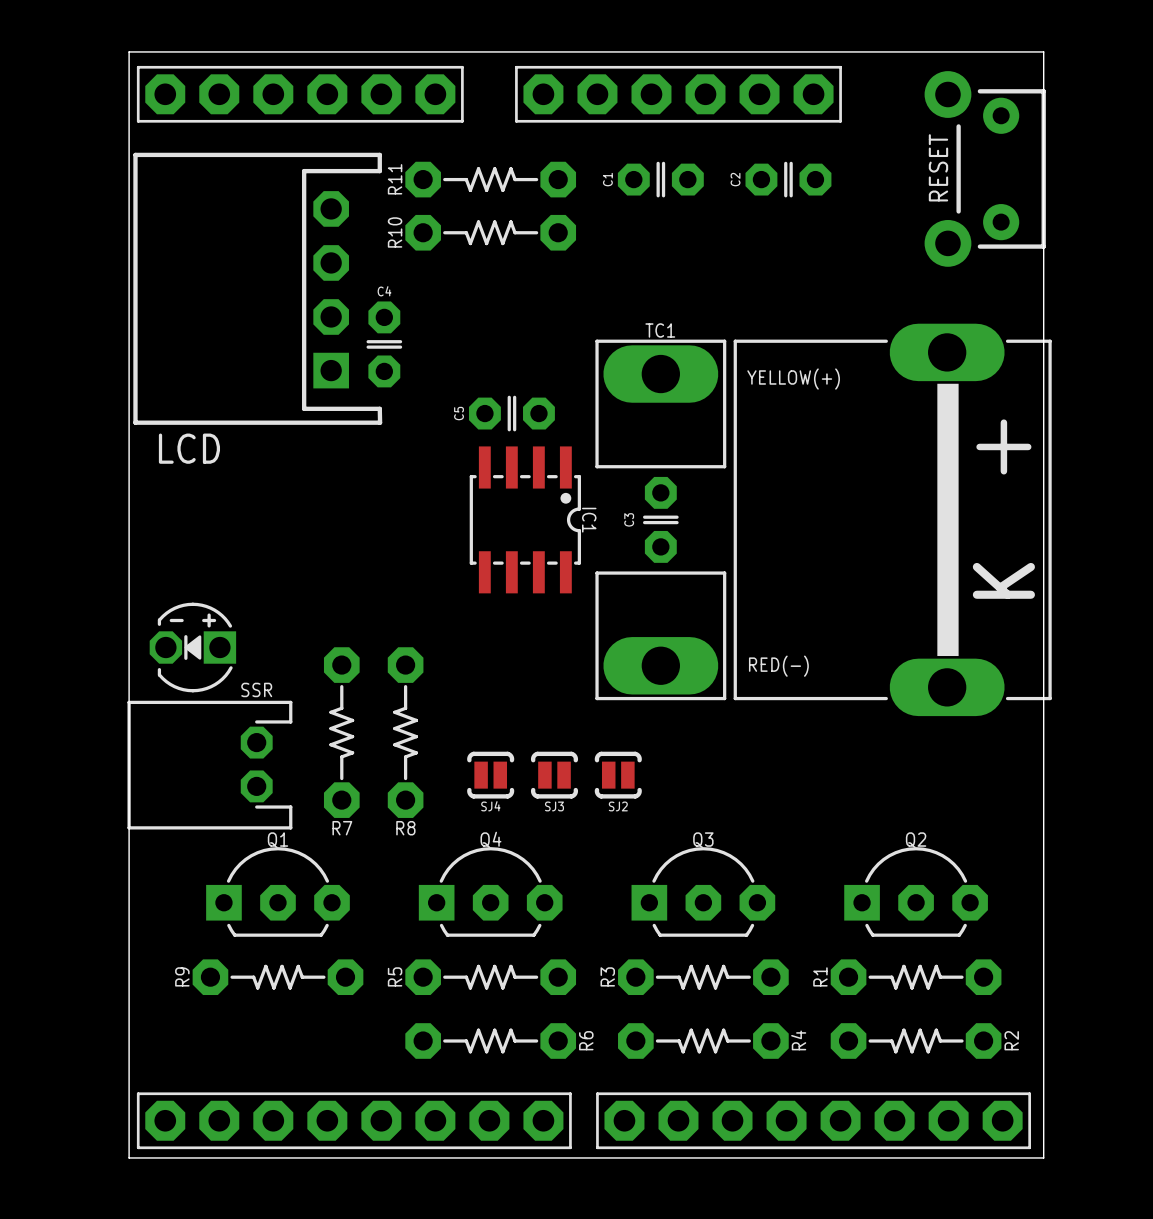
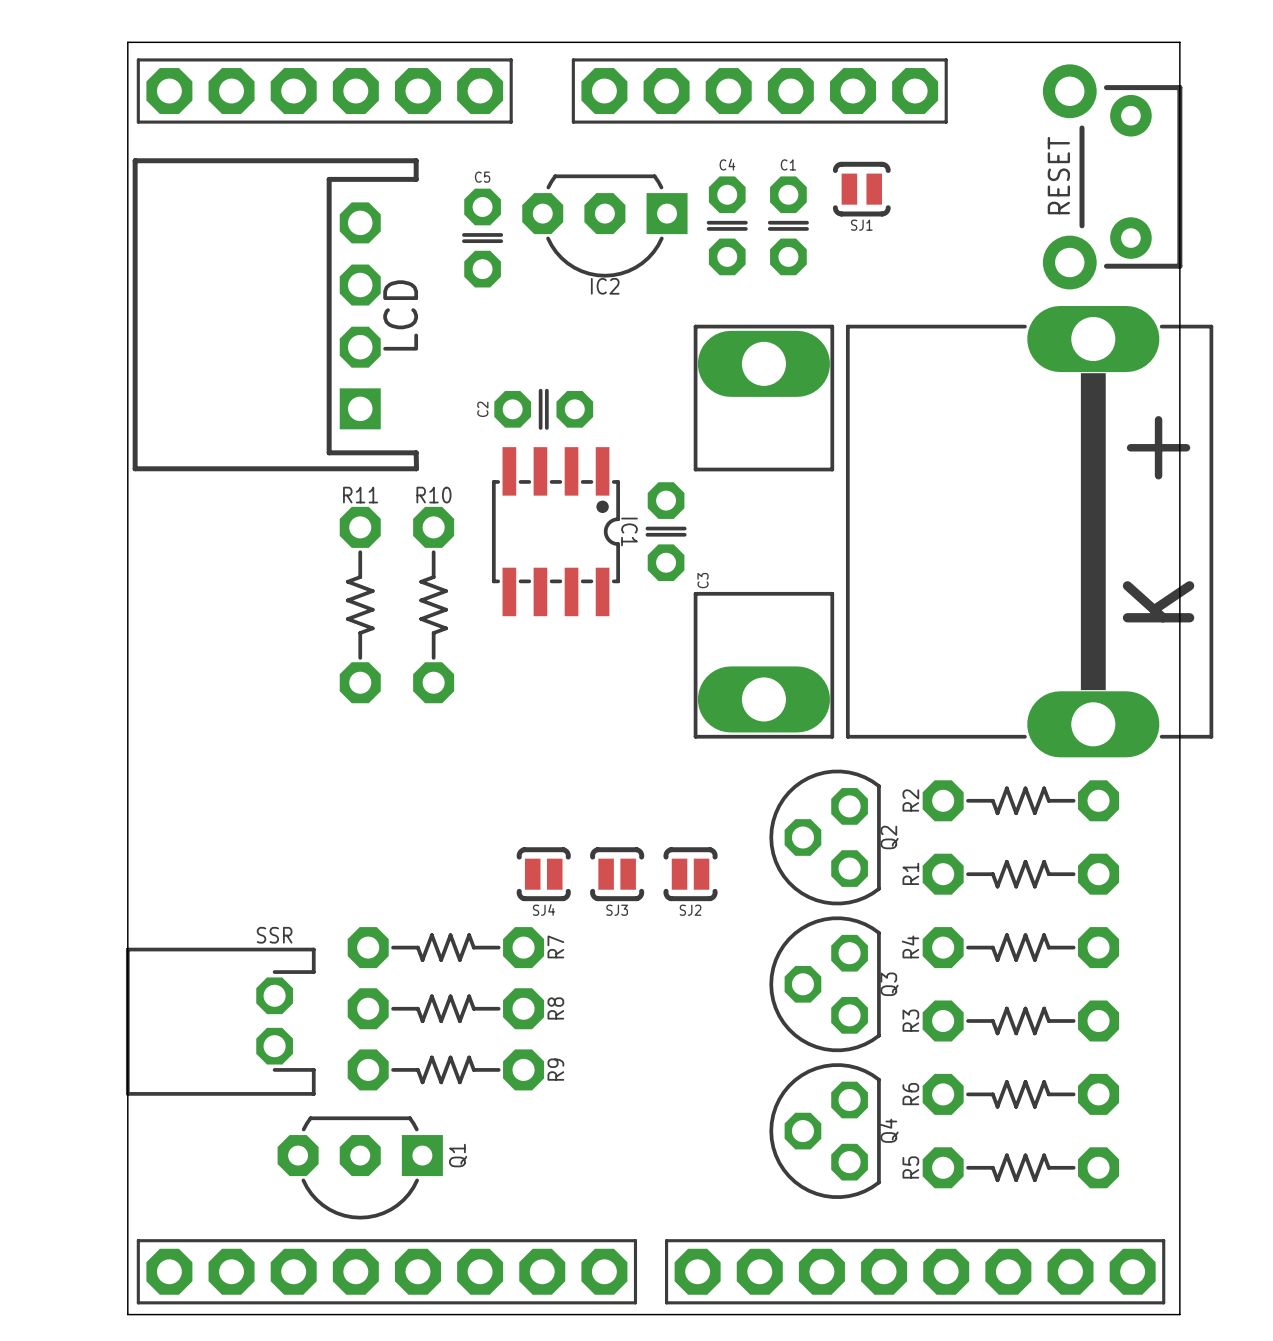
R11 rotation: 0° (490, 179) -> 90° clockwise (360, 605)
R11 position: (490, 179) -> (360, 605)
C1 rotation: 0° (660, 179) -> 90° clockwise (788, 225)
C1 position: (660, 179) -> (788, 225)
SJ1: none -> (861, 189)
C2 position: (788, 179) -> (543, 409)
IC2: none -> (604, 226)
R10 rotation: 0° (490, 232) -> 90° clockwise (433, 605)
R10 position: (490, 232) -> (433, 605)
C4 position: (384, 344) -> (727, 225)
C5 rotation: 0° (511, 413) -> 90° clockwise (482, 238)
C5 position: (511, 413) -> (482, 238)
LCD name rotation: 0° (189, 448) -> 90° counterclockwise (400, 315)
LCD name position: LCD (189, 448) -> LCD (400, 315)
part: none -> (953, 531)
IC1 position: (525, 519) -> (555, 531)
C3 position: (660, 519) -> (666, 531)
TC1: (823, 519) -> none
part: (192, 647) -> none
R7 rotation: 0° (341, 732) -> 90° clockwise (445, 947)
R7 position: (341, 732) -> (445, 947)
R8 rotation: 0° (405, 732) -> 90° clockwise (445, 1008)
R8 position: (405, 732) -> (445, 1008)
SSR position: (209, 765) -> (220, 1021)
R7 name position: R7 (342, 828) -> R7 (555, 946)
R8 name position: R8 (405, 828) -> R8 (555, 1008)
Q4 name position: Q4 (490, 839) -> Q4 (889, 1130)
Q1 name position: Q1 (277, 840) -> Q1 (458, 1155)
Q3 name position: Q3 (703, 840) -> Q3 (889, 984)
Q2 name position: Q2 (916, 840) -> Q2 (889, 837)
Q4 footprint: [418, 847, 563, 937] -> [769, 1063, 881, 1199]
Q3 footprint: [631, 847, 776, 937] -> [769, 916, 881, 1053]
Q2 footprint: [844, 847, 988, 937] -> [769, 769, 881, 906]
Q1 rotation: 0° (277, 891) -> 180° (360, 1167)
Q1 position: (277, 891) -> (360, 1167)
R9 name position: R9 (182, 976) -> R9 (555, 1069)
R9 position: (277, 977) -> (445, 1069)
R5 position: (490, 977) -> (1020, 1167)
R3 position: (703, 977) -> (1020, 1020)
R1 position: (916, 977) -> (1020, 874)
R6 name position: R6 (586, 1040) -> R6 (910, 1094)
R4 name position: R4 (798, 1040) -> R4 (910, 946)
R2 name position: R2 (1011, 1040) -> R2 (910, 800)
R6 position: (490, 1041) -> (1020, 1094)
R4 position: (703, 1041) -> (1020, 947)
R2 position: (916, 1041) -> (1020, 800)

